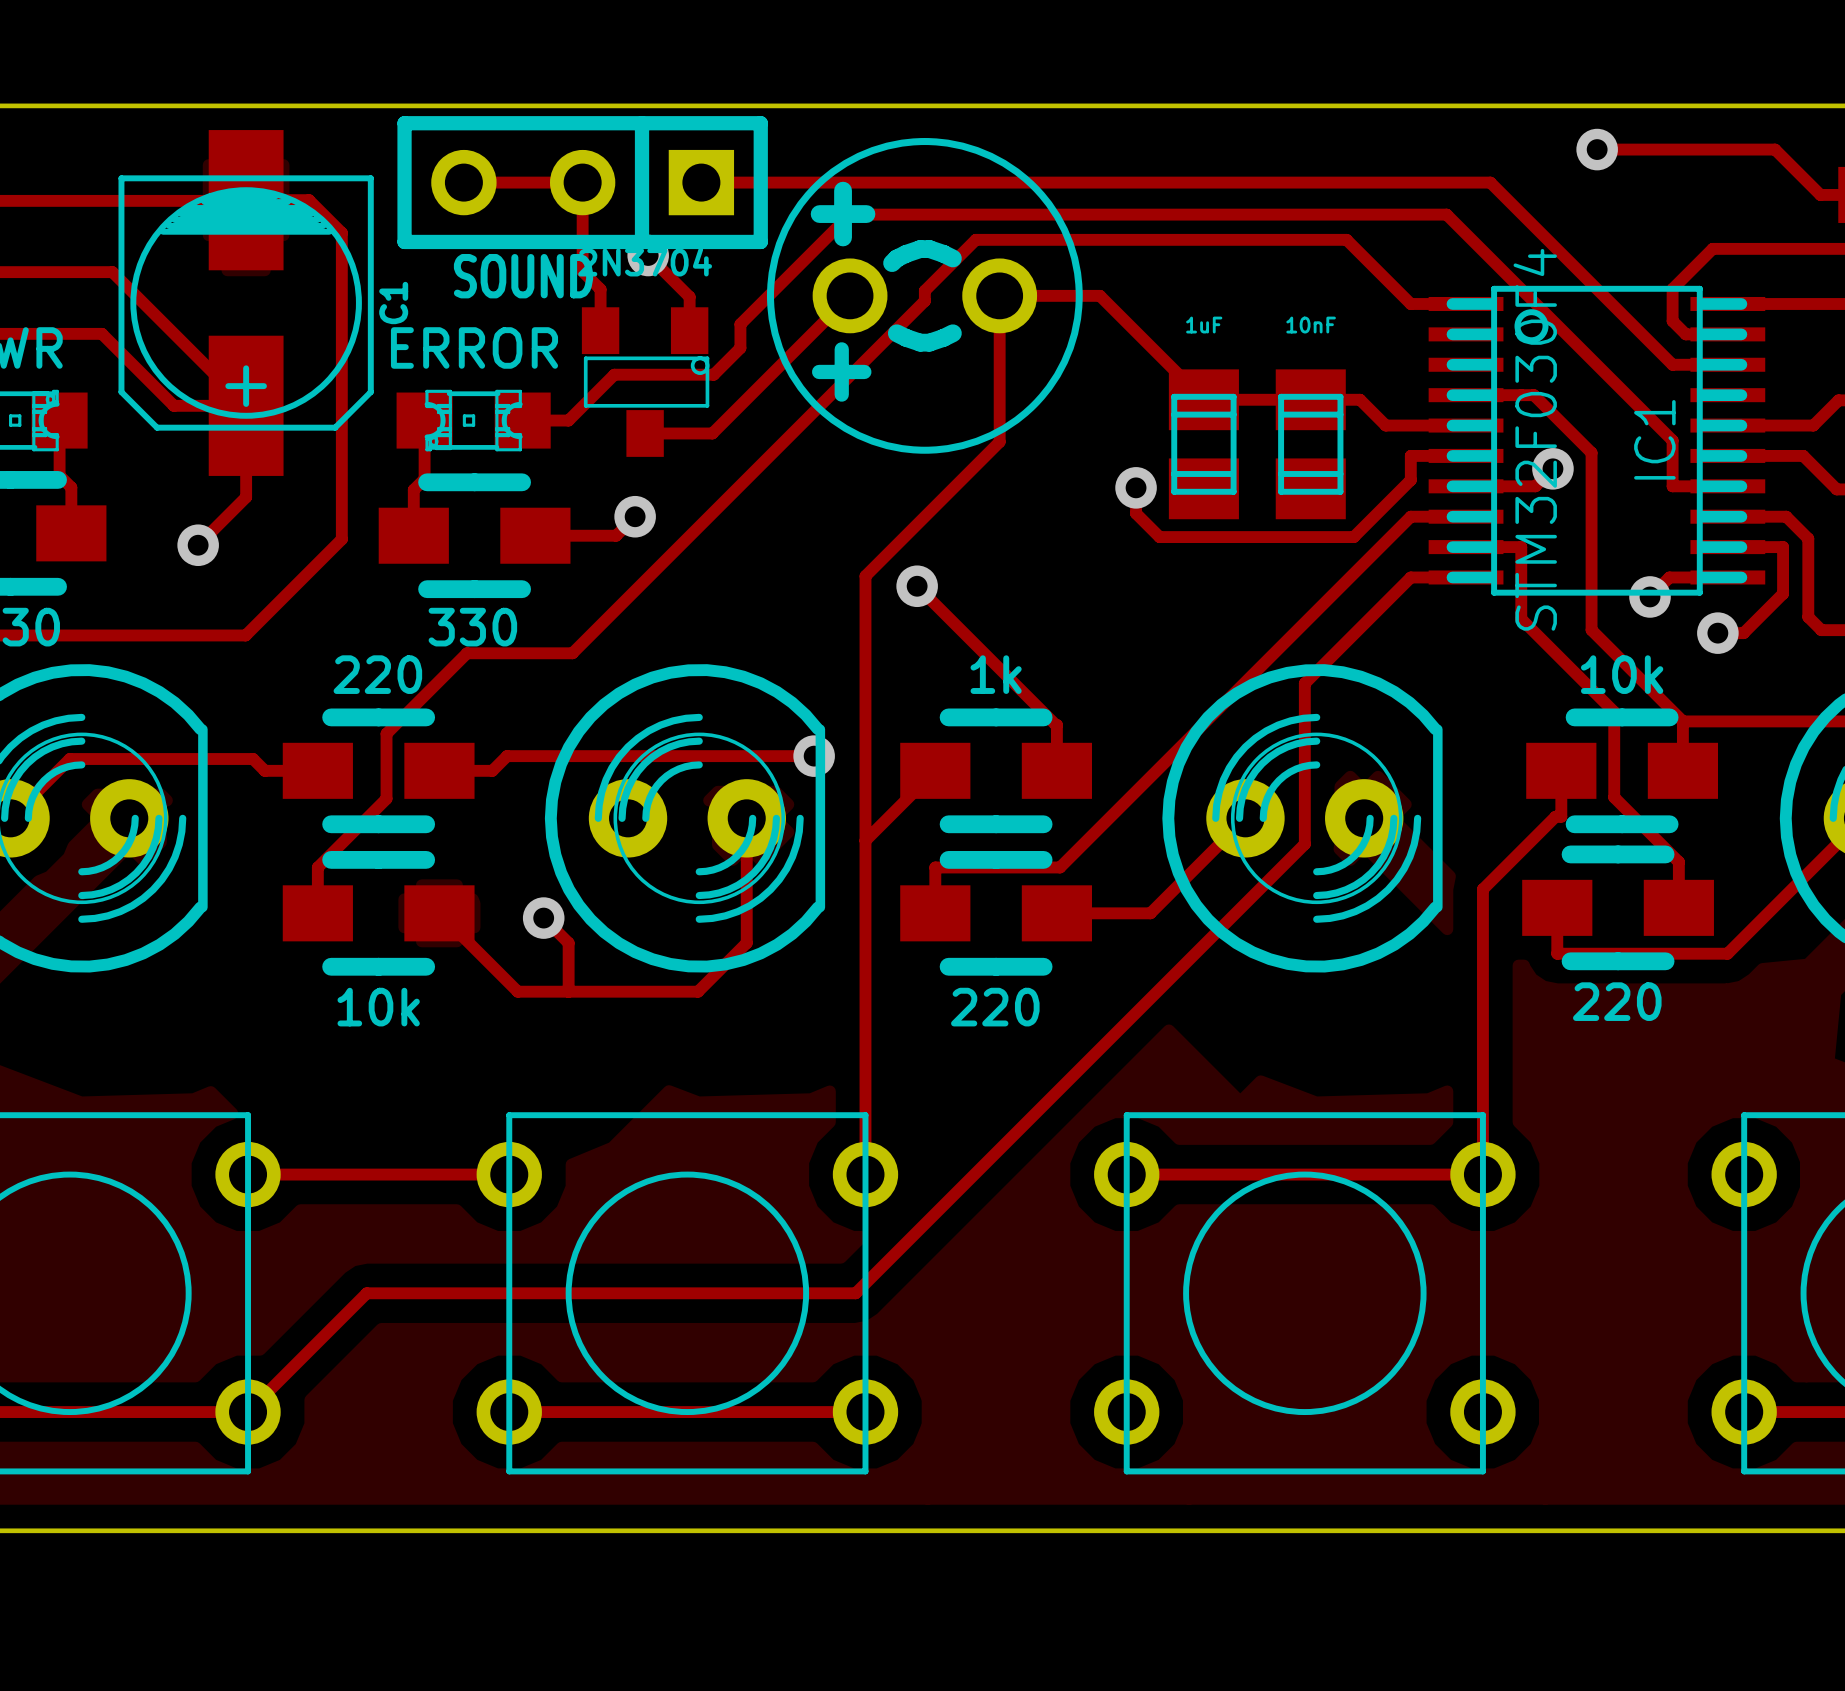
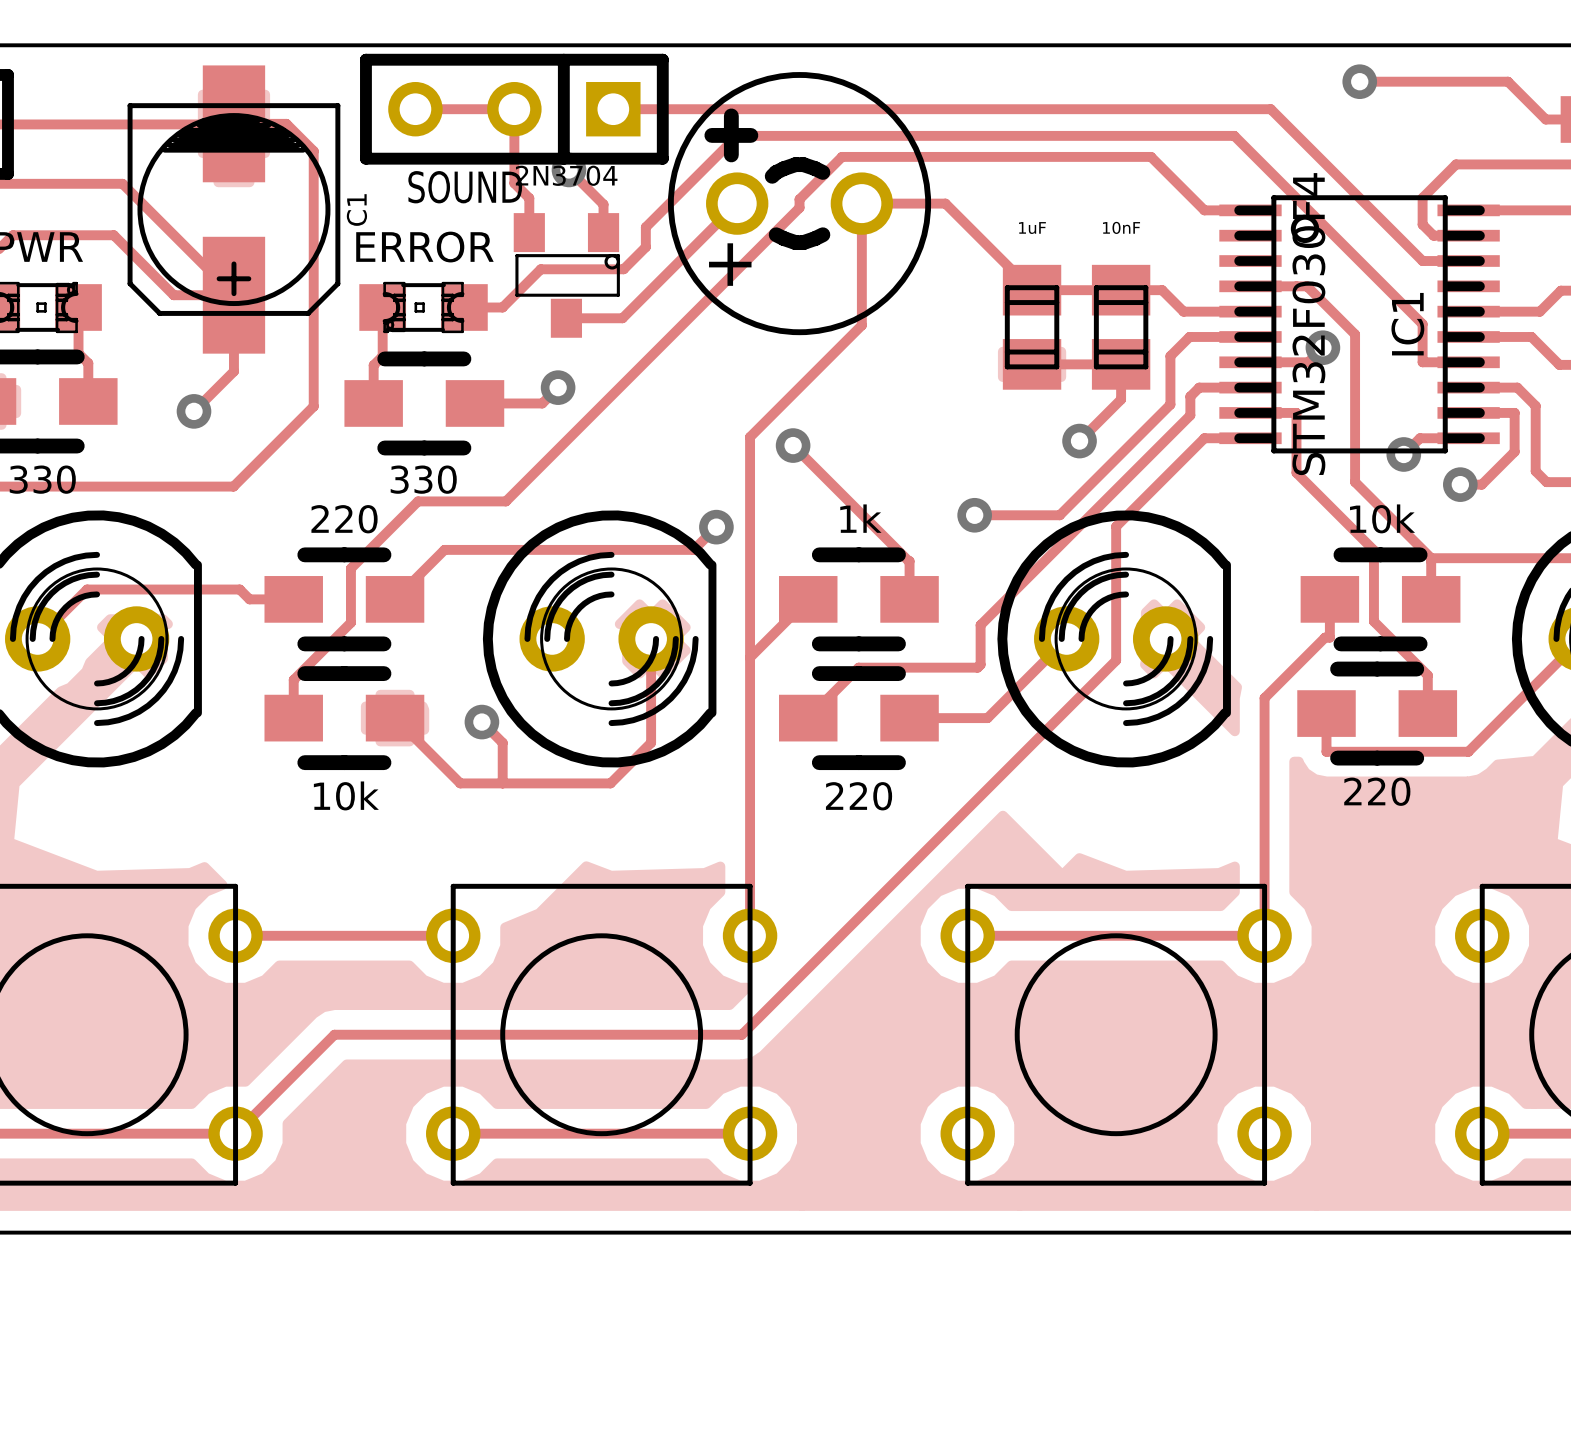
track: (1410, 455) (1410, 480) (1353, 537) (1159, 537) (1136, 513) (1136, 487) -> (1204, 336) (1189, 336) (1170, 356) (1170, 404) (1059, 515) (974, 515)
via: (1136, 487) -> none
track: none -> (1032, 364) (1121, 364) (1121, 399) (1079, 441)
track: (1410, 516) (1060, 867) (935, 867) (935, 913) -> (1204, 387) (1199, 387) (1190, 396) (1190, 415) (980, 625) (980, 664) (977, 667) (858, 667) (808, 718)
via: none -> (1079, 441)
via: none -> (974, 515)
track: (814, 756) (507, 756) (492, 770) (439, 770) -> (716, 527) (693, 549) (444, 549) (395, 599)
via position: (814, 756) -> (716, 527)

